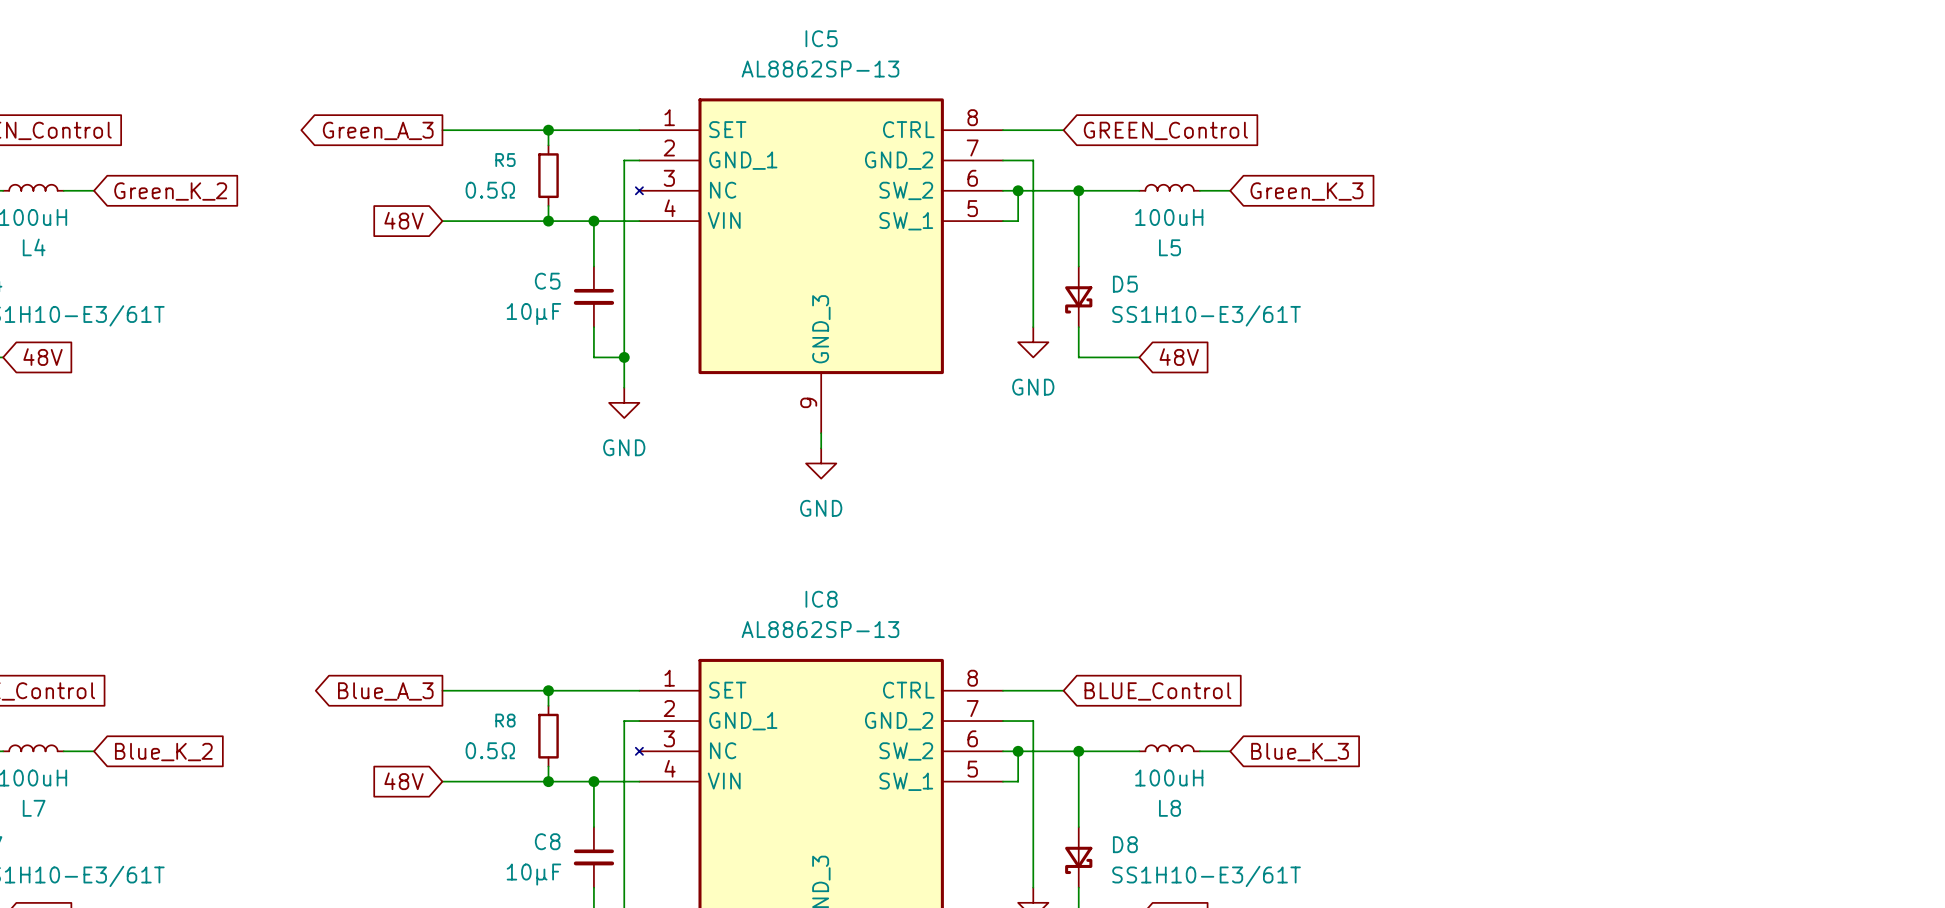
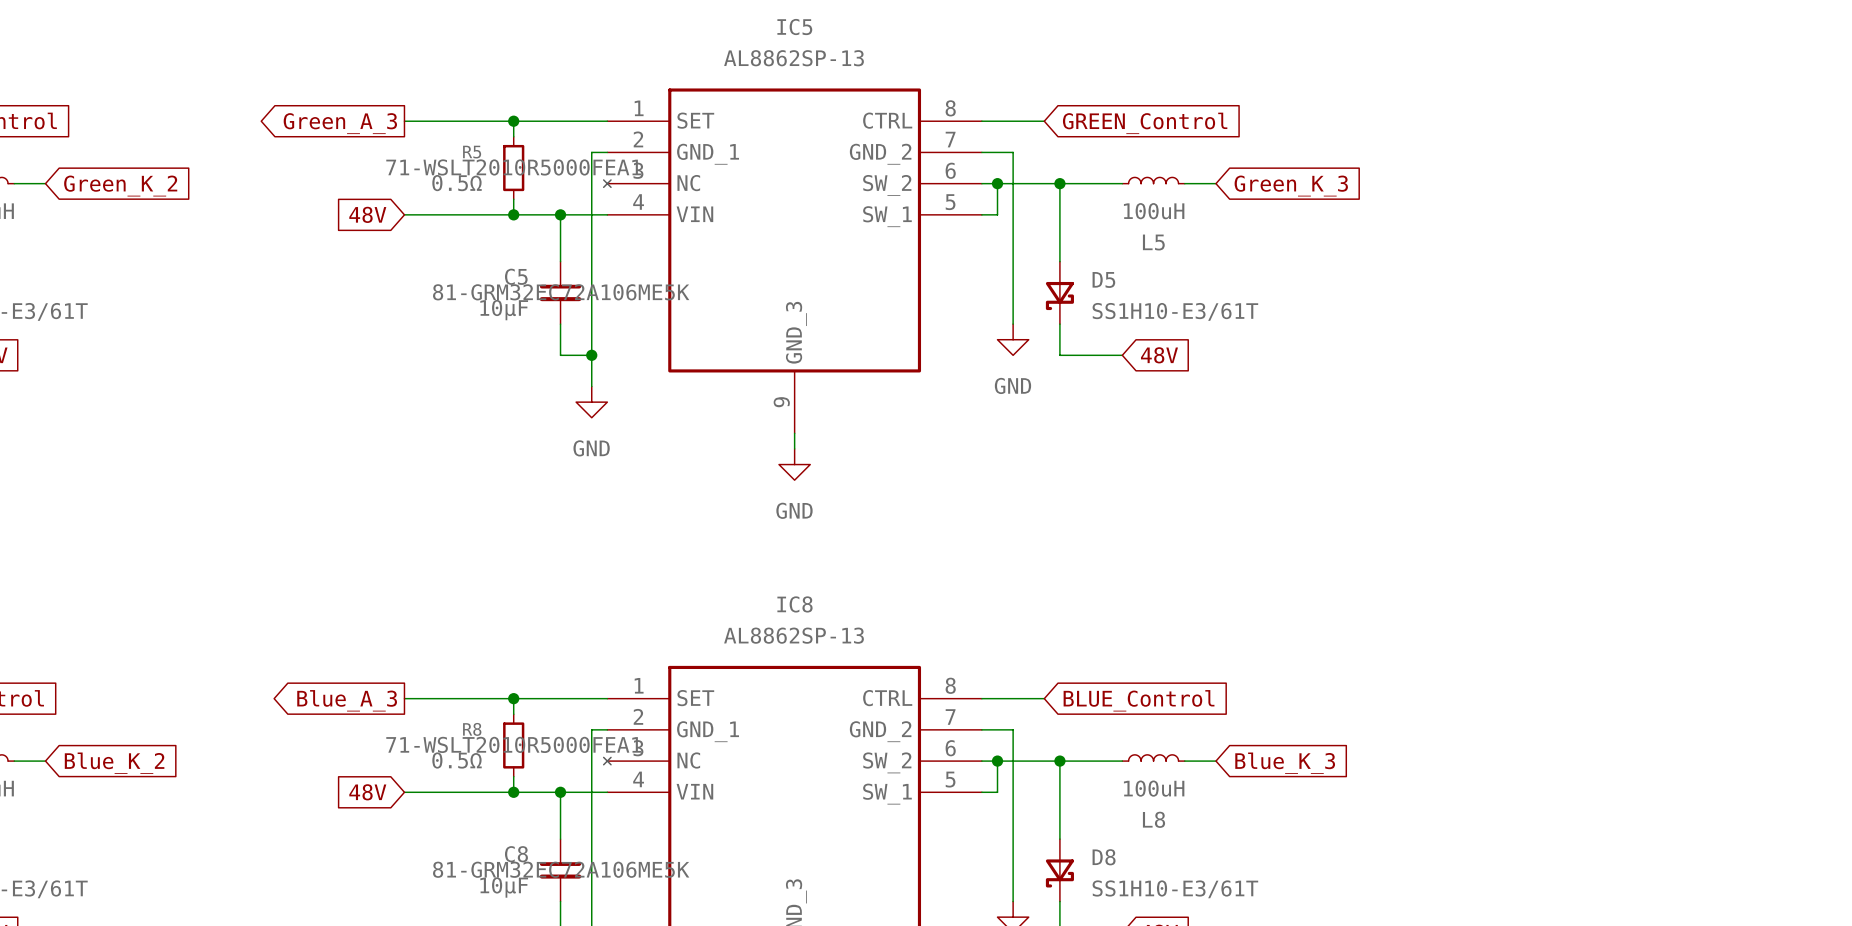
R5 text: none -> 71-WSLT2010R5000FEA1 (513, 167)
C5 text: none -> 81-GRM32EC72A106ME5K (561, 292)
R8 text: none -> 71-WSLT2010R5000FEA1 (513, 744)
C8 text: none -> 81-GRM32EC72A106ME5K (561, 869)

